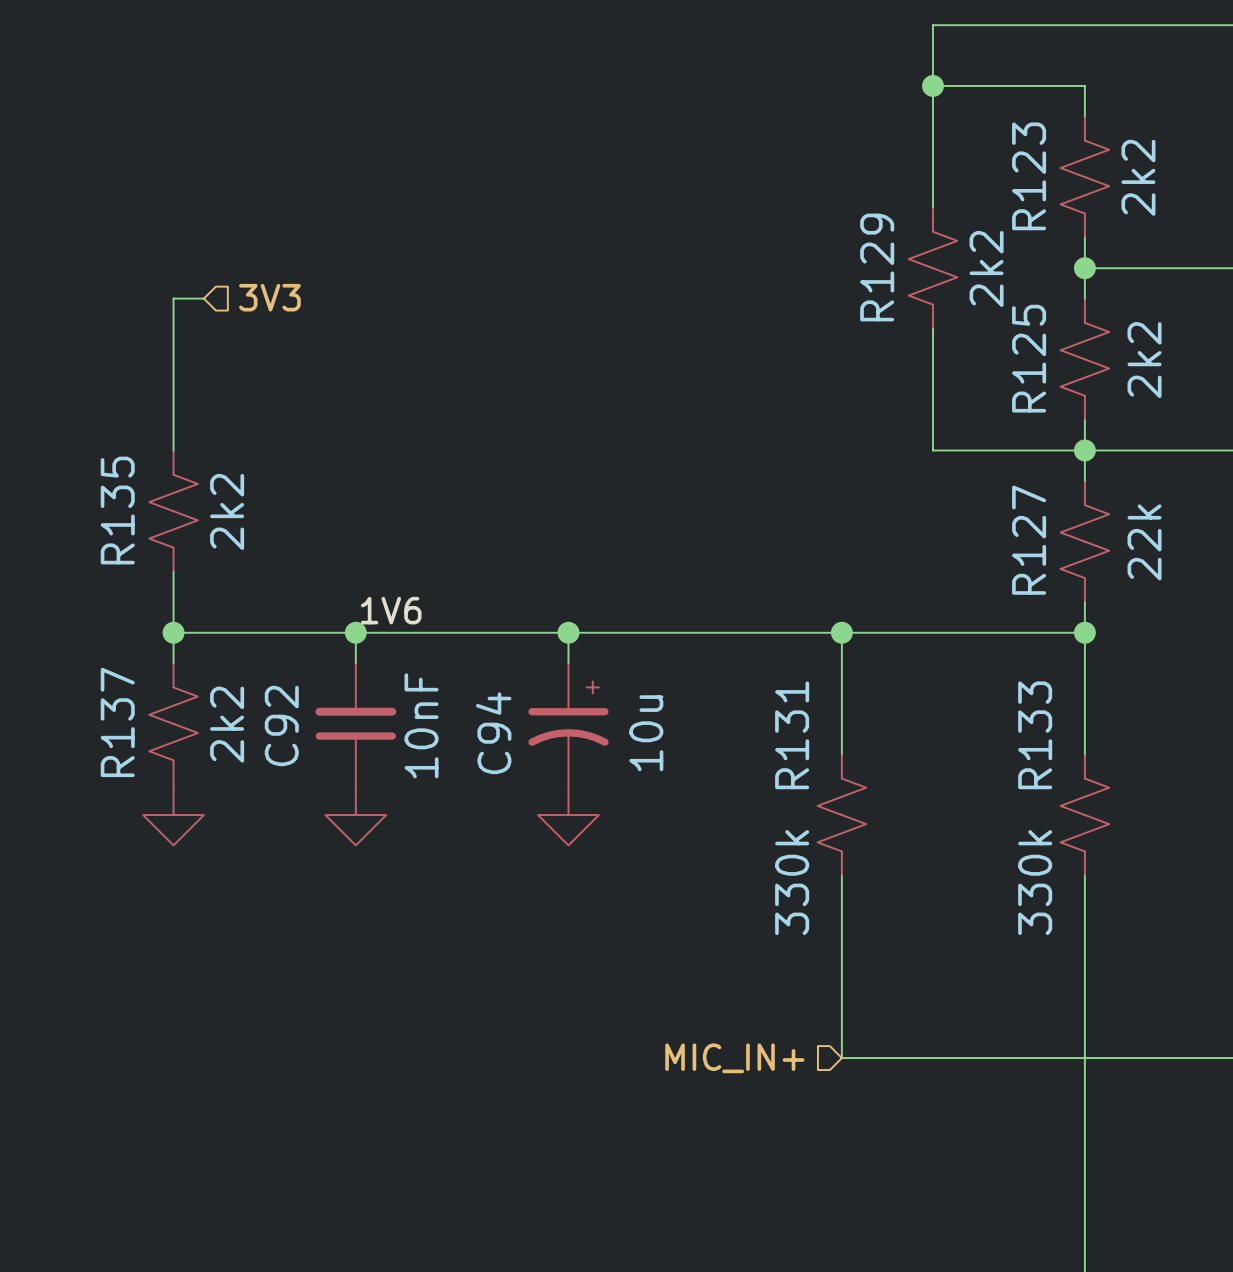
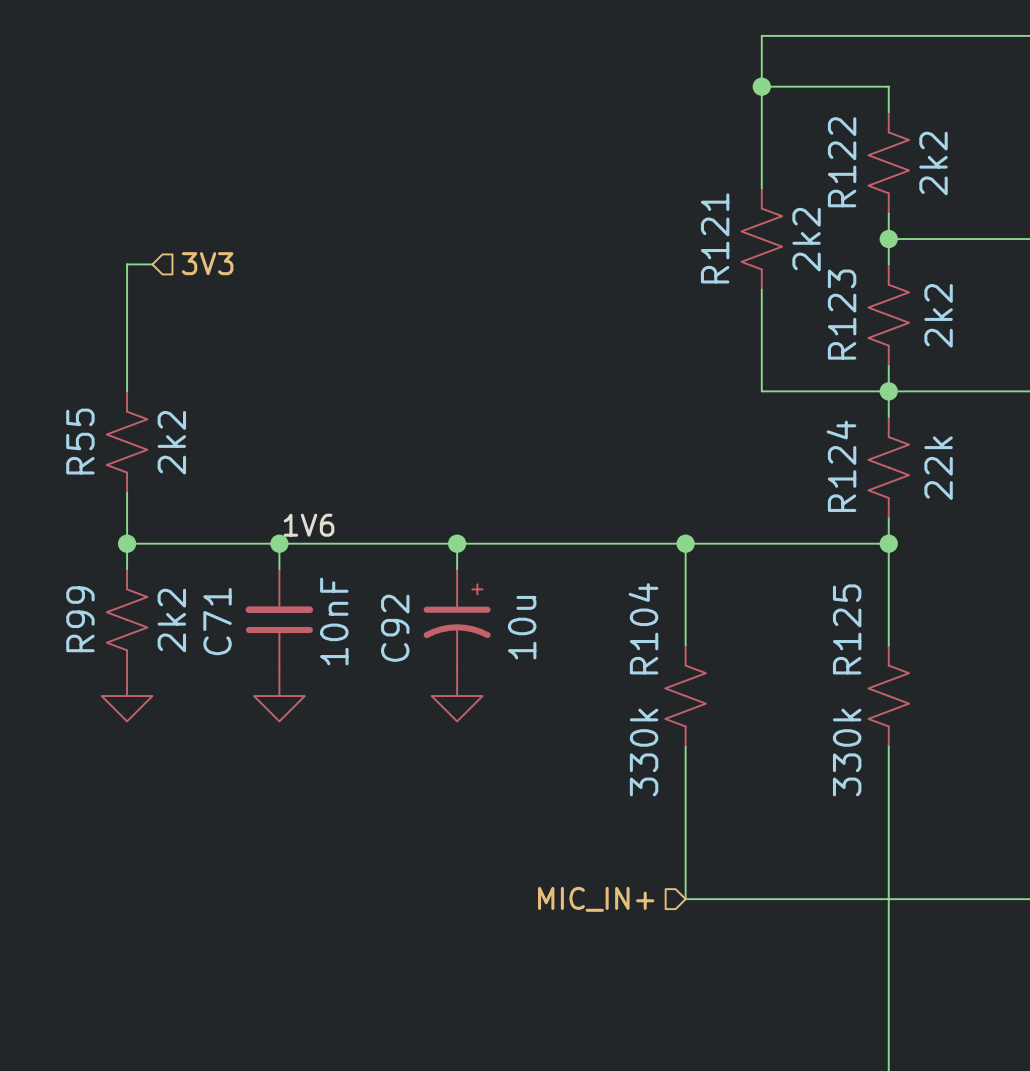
R123 name: R123 (1029, 176) -> R122 (842, 162)
R129 name: R129 (877, 267) -> R121 (715, 238)
R125 name: R125 (1029, 358) -> R123 (842, 314)
R135 name: R135 (117, 510) -> R55 (80, 441)
R127 name: R127 (1029, 540) -> R124 (841, 466)
R137 name: R137 (117, 722) -> R99 (80, 619)
C92 name: C92 (281, 725) -> C71 (217, 621)
C94 name: C94 (493, 733) -> C92 (395, 628)
R131 name: R131 (792, 735) -> R104 (643, 628)
R133 name: R133 (1035, 735) -> R125 (847, 629)

